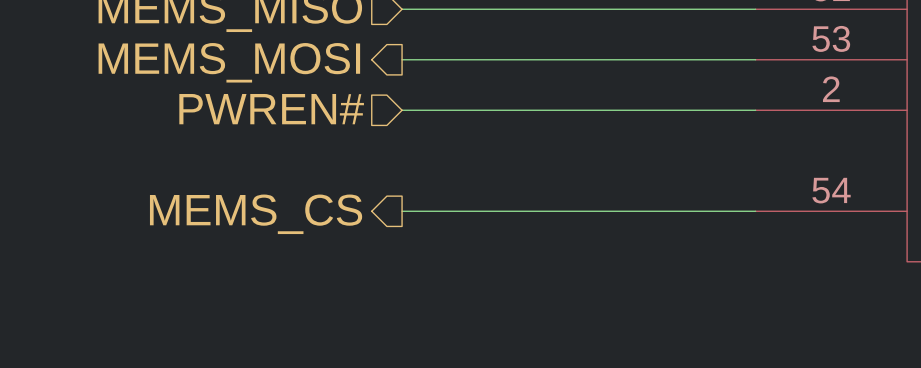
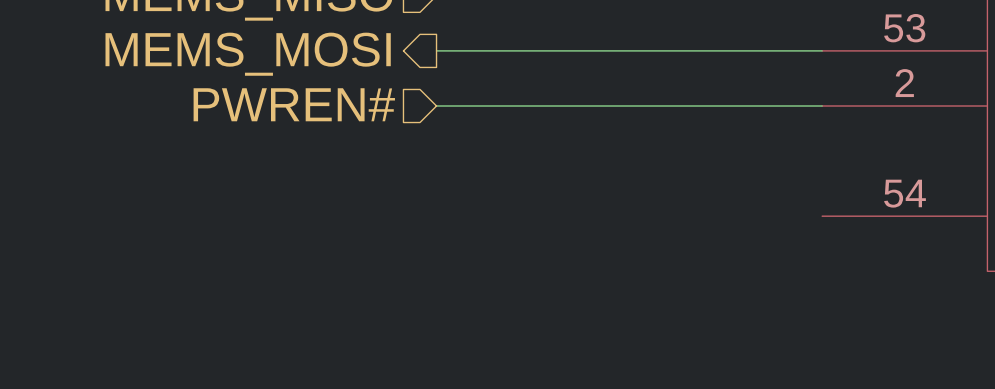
wire: (402, 211) (755, 211) -> none
hierarchical label: MEMS_CS (256, 214) -> none

